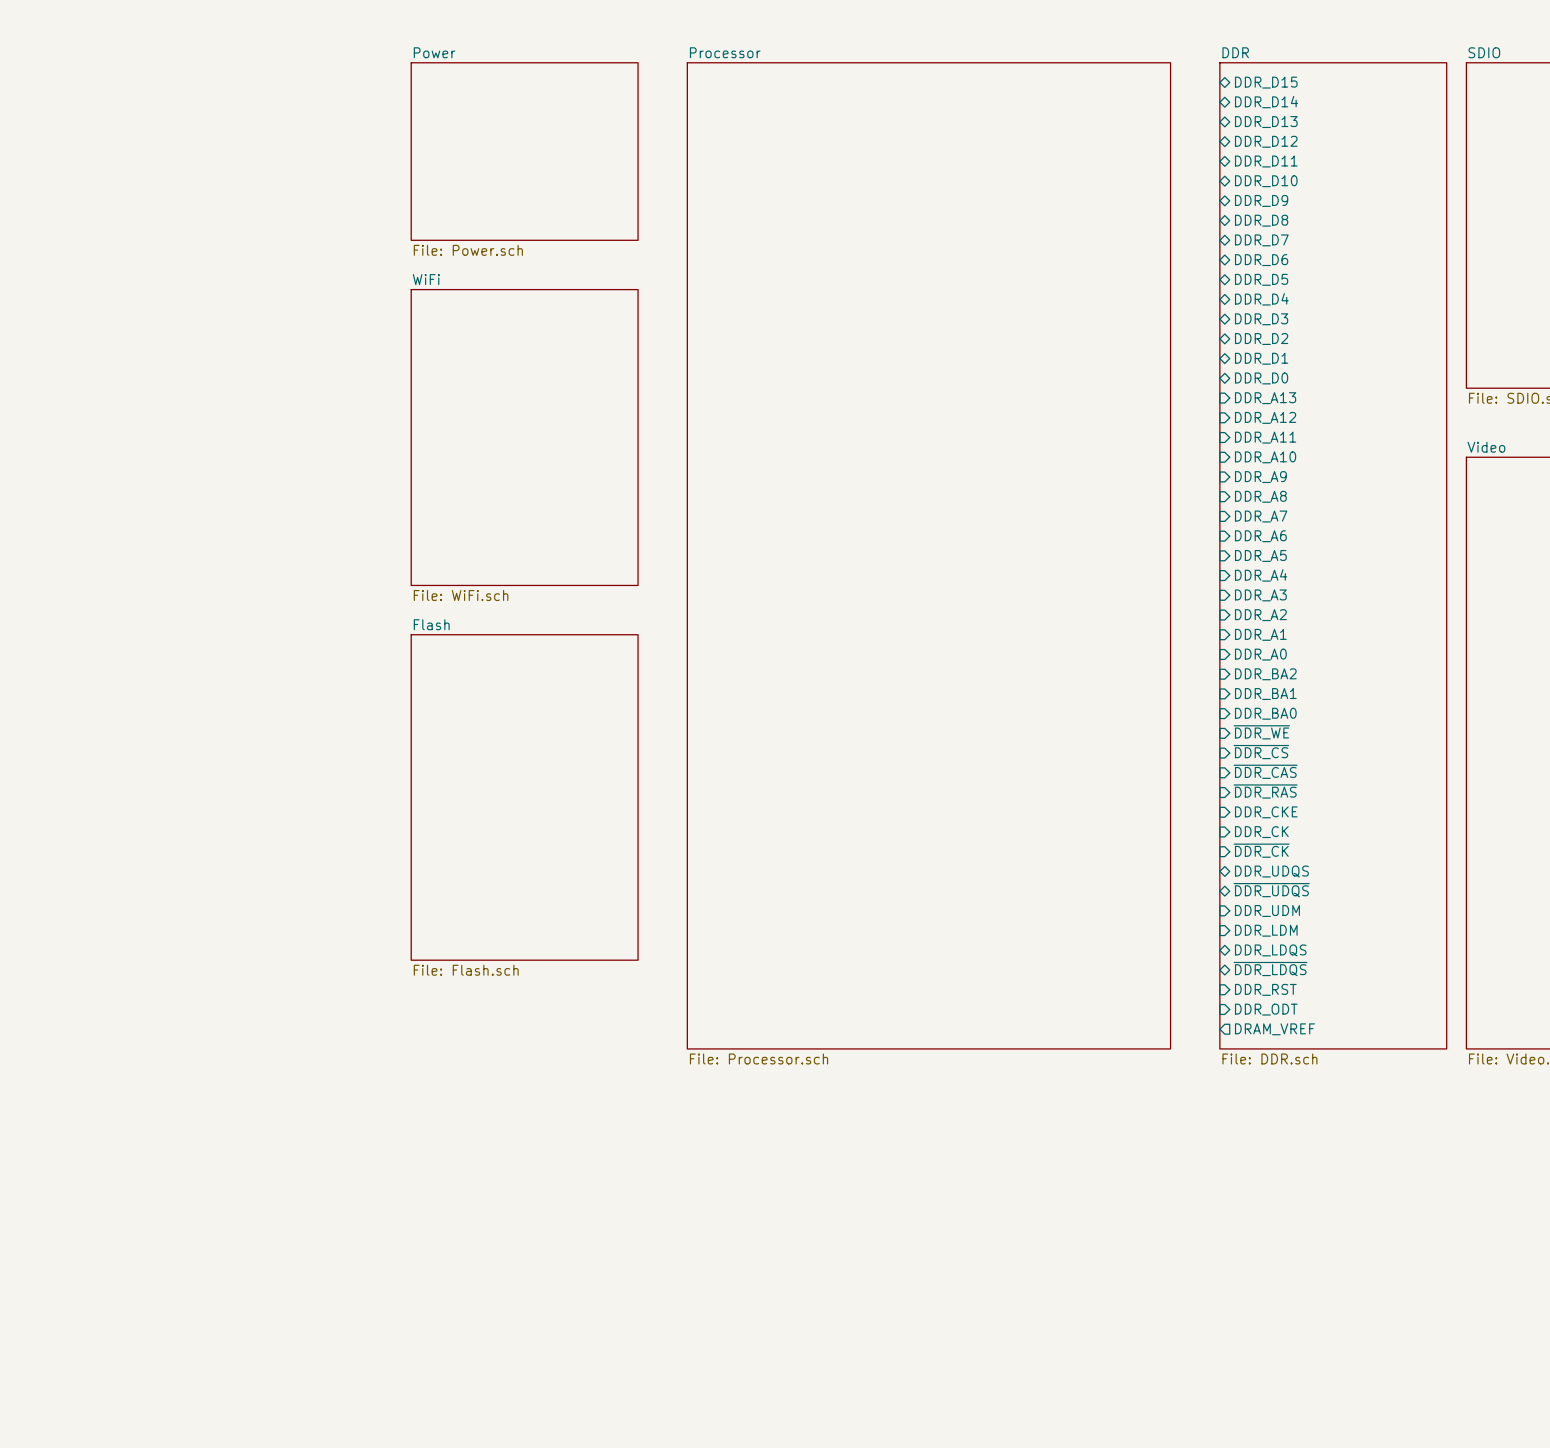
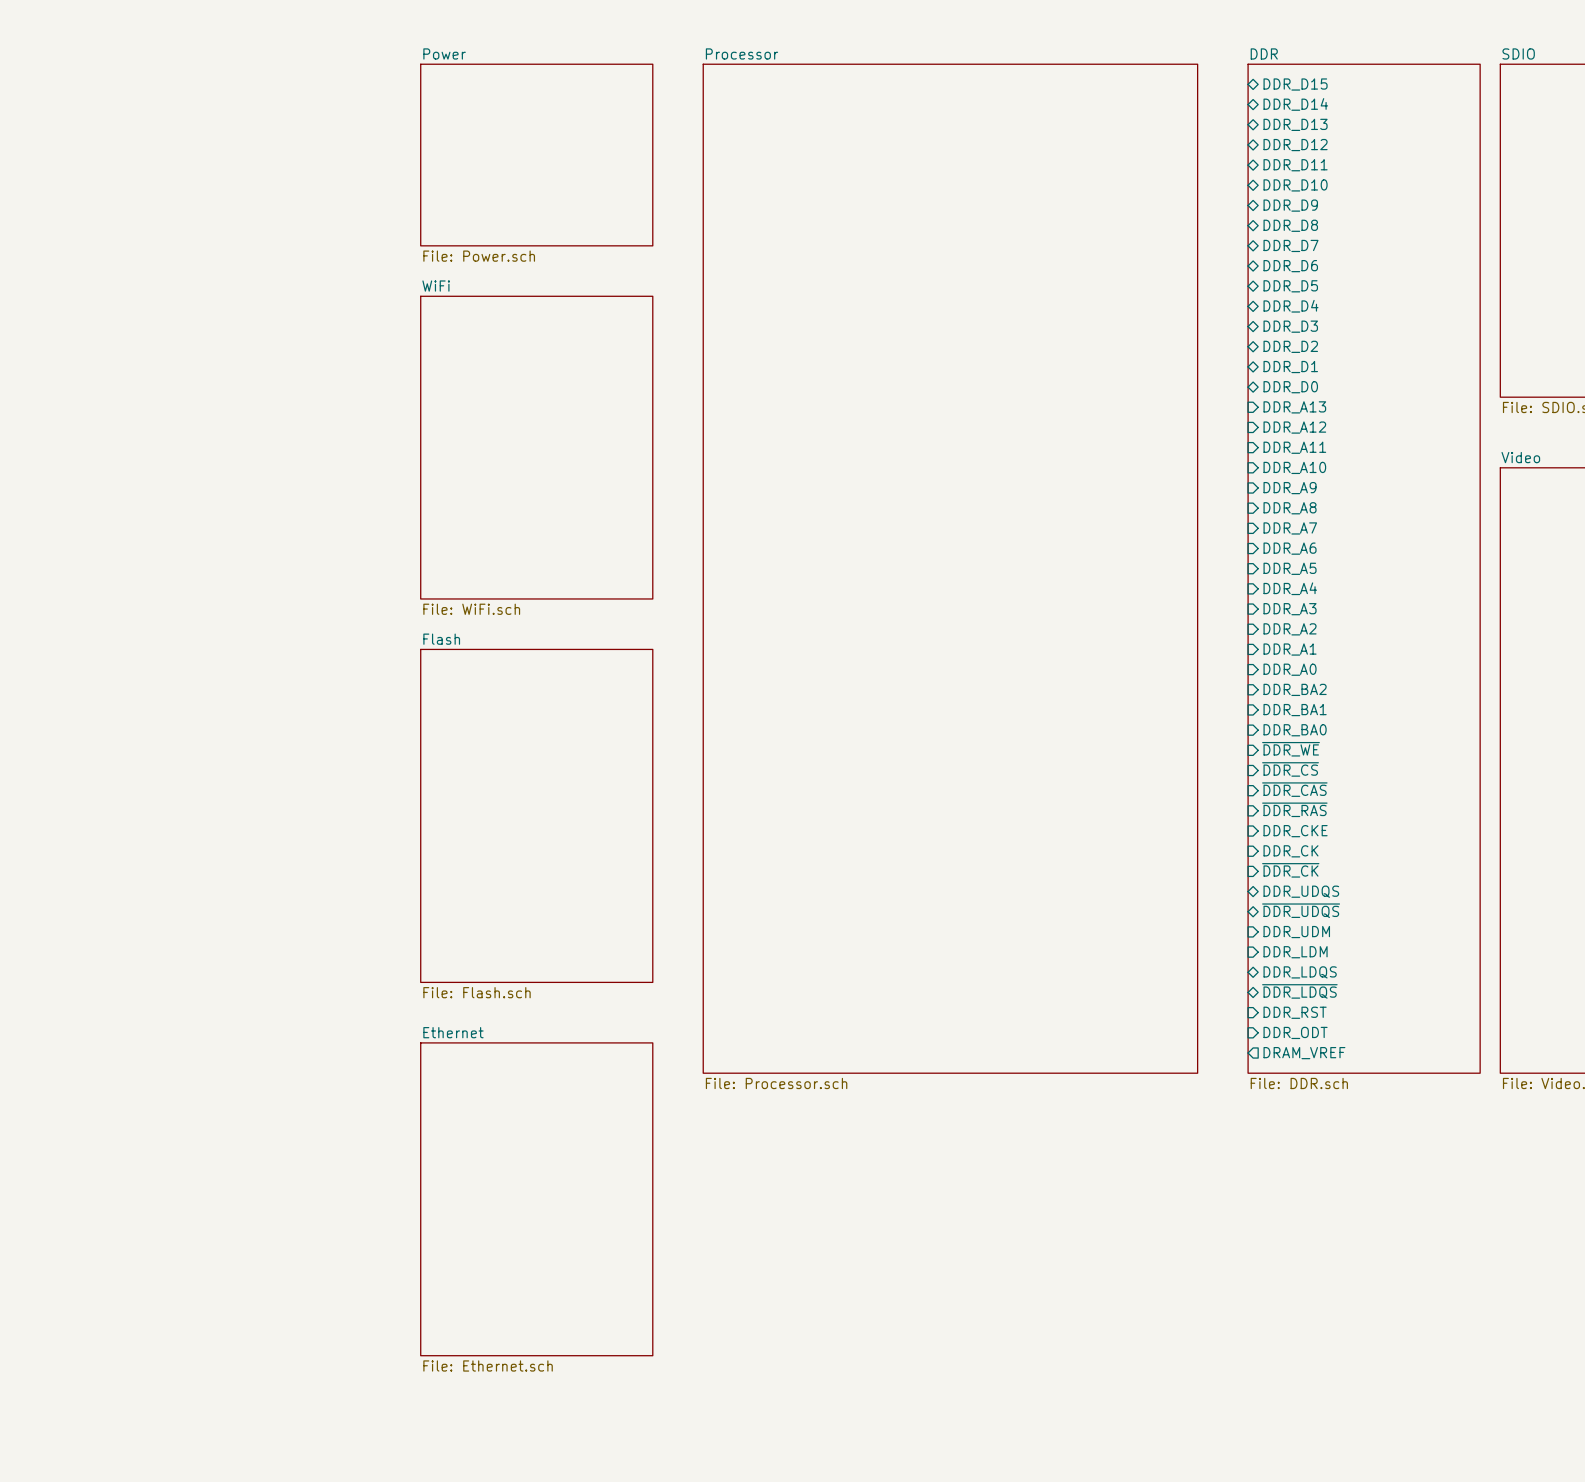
sheet Ethernet: none -> File: Ethernet.sch (536, 1199)

